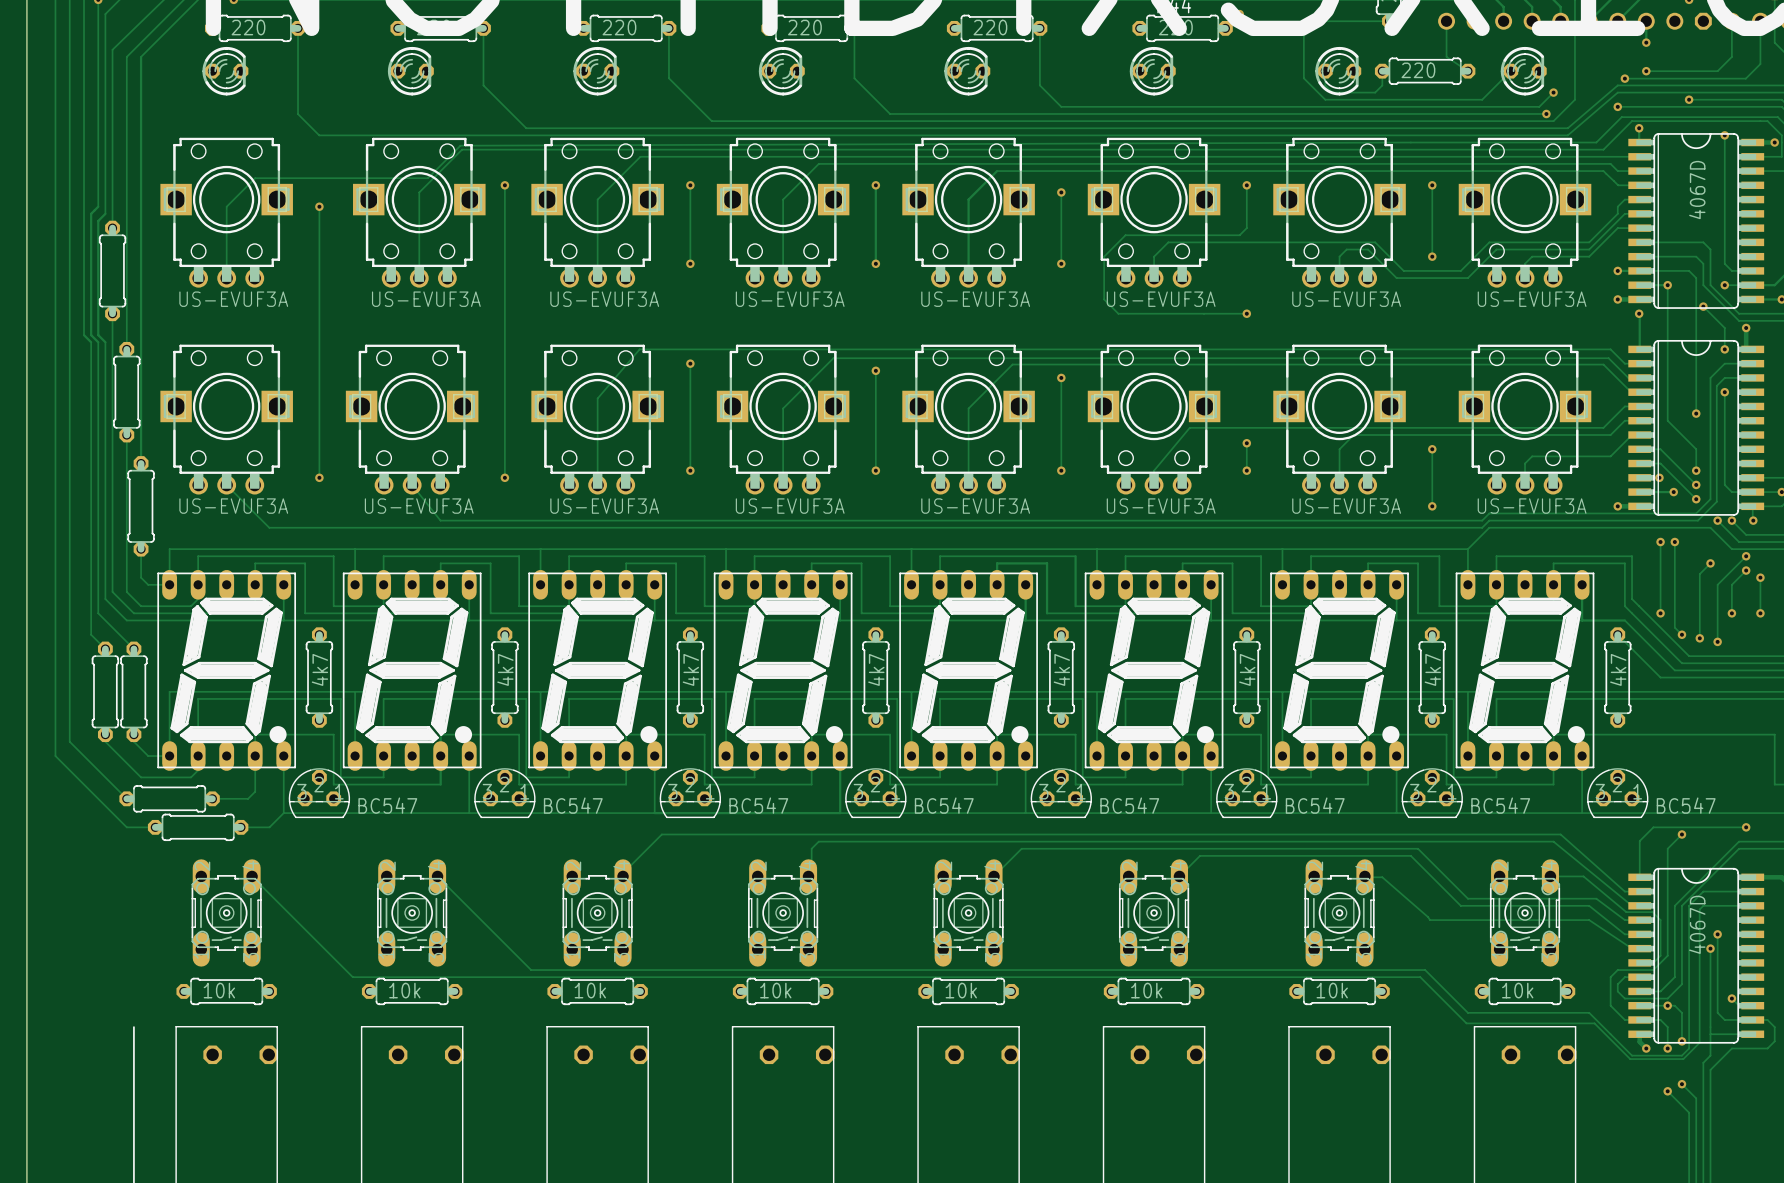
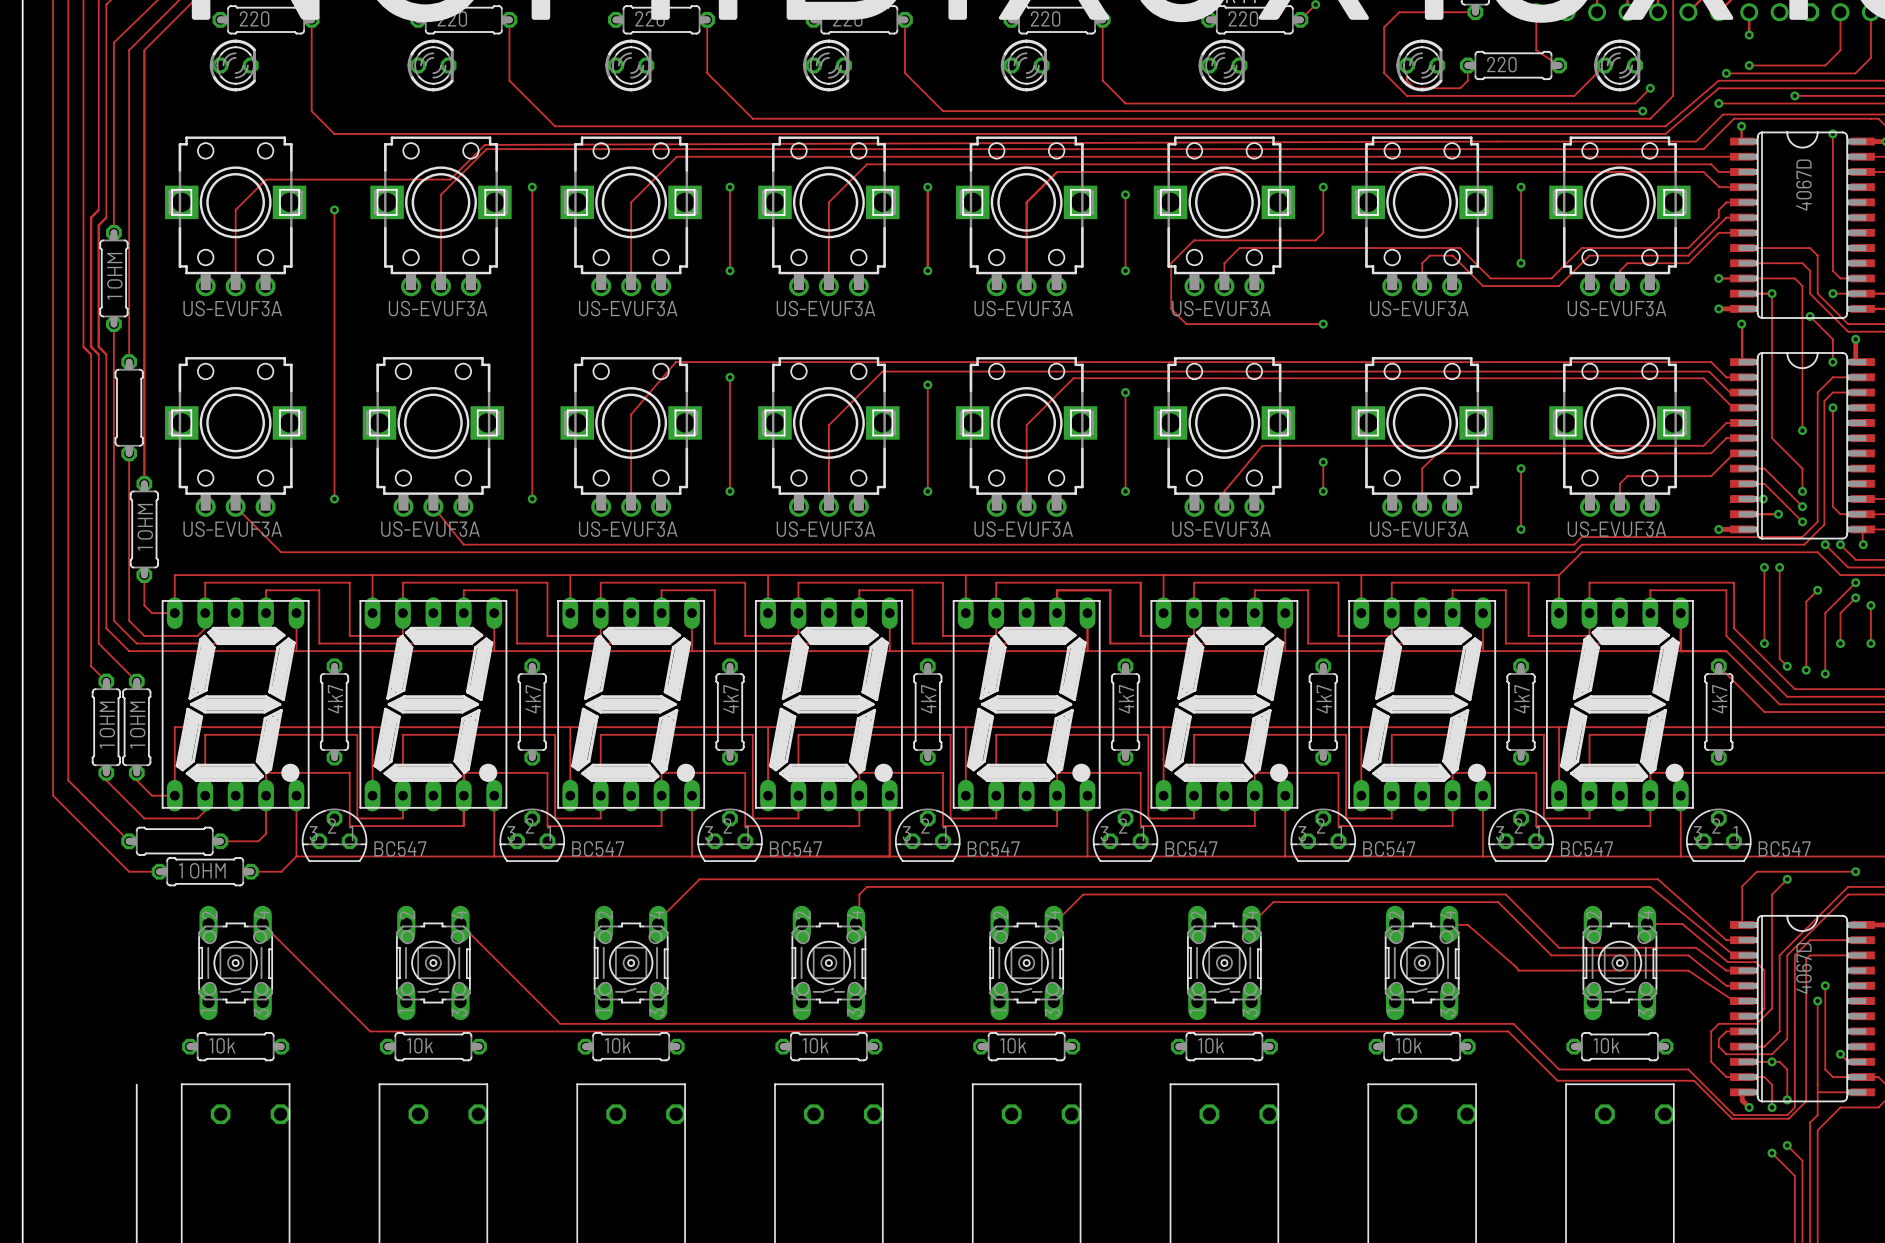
part value: none -> 1 OHM (114, 276)
part value: none -> 1 OHM (145, 527)
part value: none -> 1 OHM (107, 725)
part value: none -> 1 OHM (137, 725)
part value: none -> 1 OHM (202, 870)

